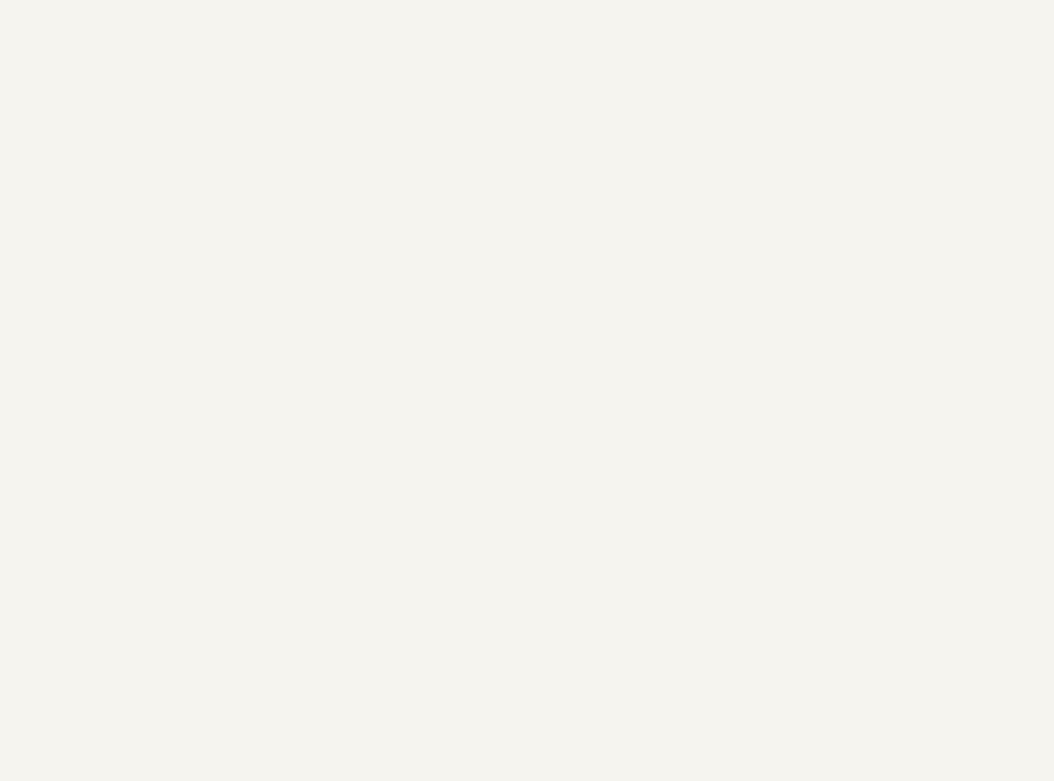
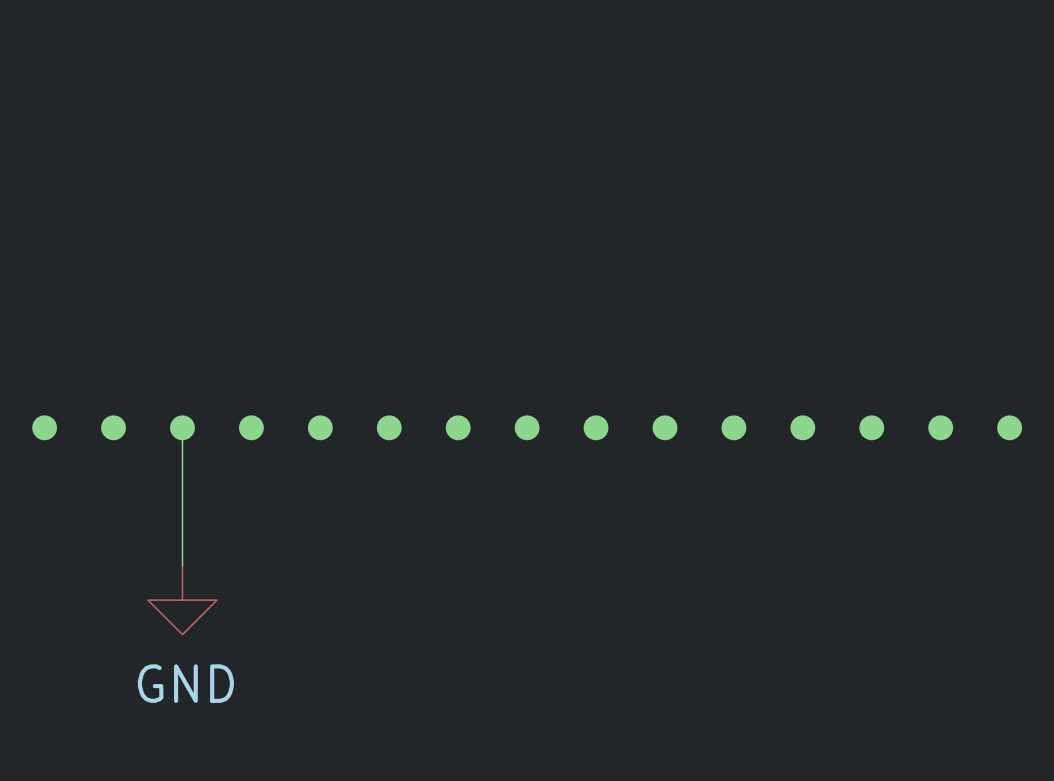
junction: none -> (44, 427)
junction: none -> (113, 427)
wire: none -> (182, 427) (182, 565)
junction: none -> (182, 427)
junction: none -> (251, 427)
junction: none -> (320, 427)
junction: none -> (389, 427)
junction: none -> (458, 427)
junction: none -> (527, 427)
junction: none -> (596, 427)
junction: none -> (664, 427)
junction: none -> (733, 427)
junction: none -> (802, 427)
junction: none -> (871, 427)
junction: none -> (940, 427)
junction: none -> (1009, 427)
power symbol: none -> GND (182, 600)

